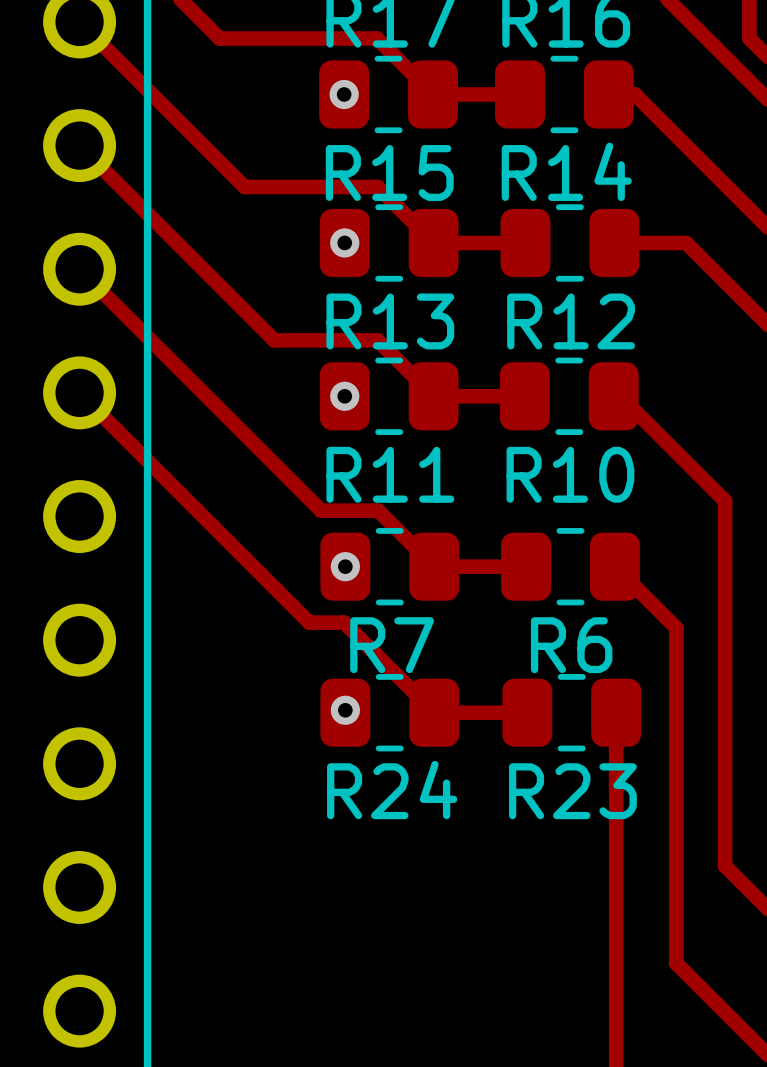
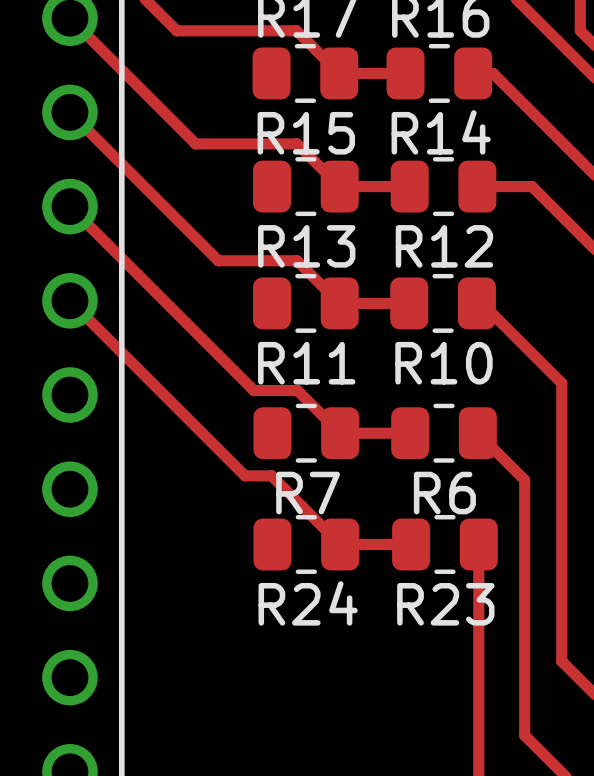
via: (344, 94) -> none
via: (344, 242) -> none
via: (344, 396) -> none
via: (345, 566) -> none
via: (345, 710) -> none

